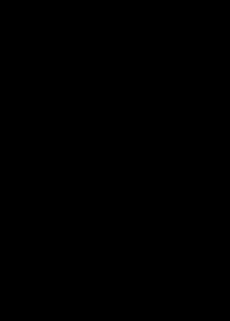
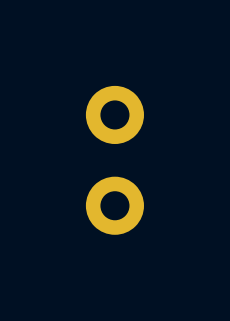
part: none -> (114, 160)

